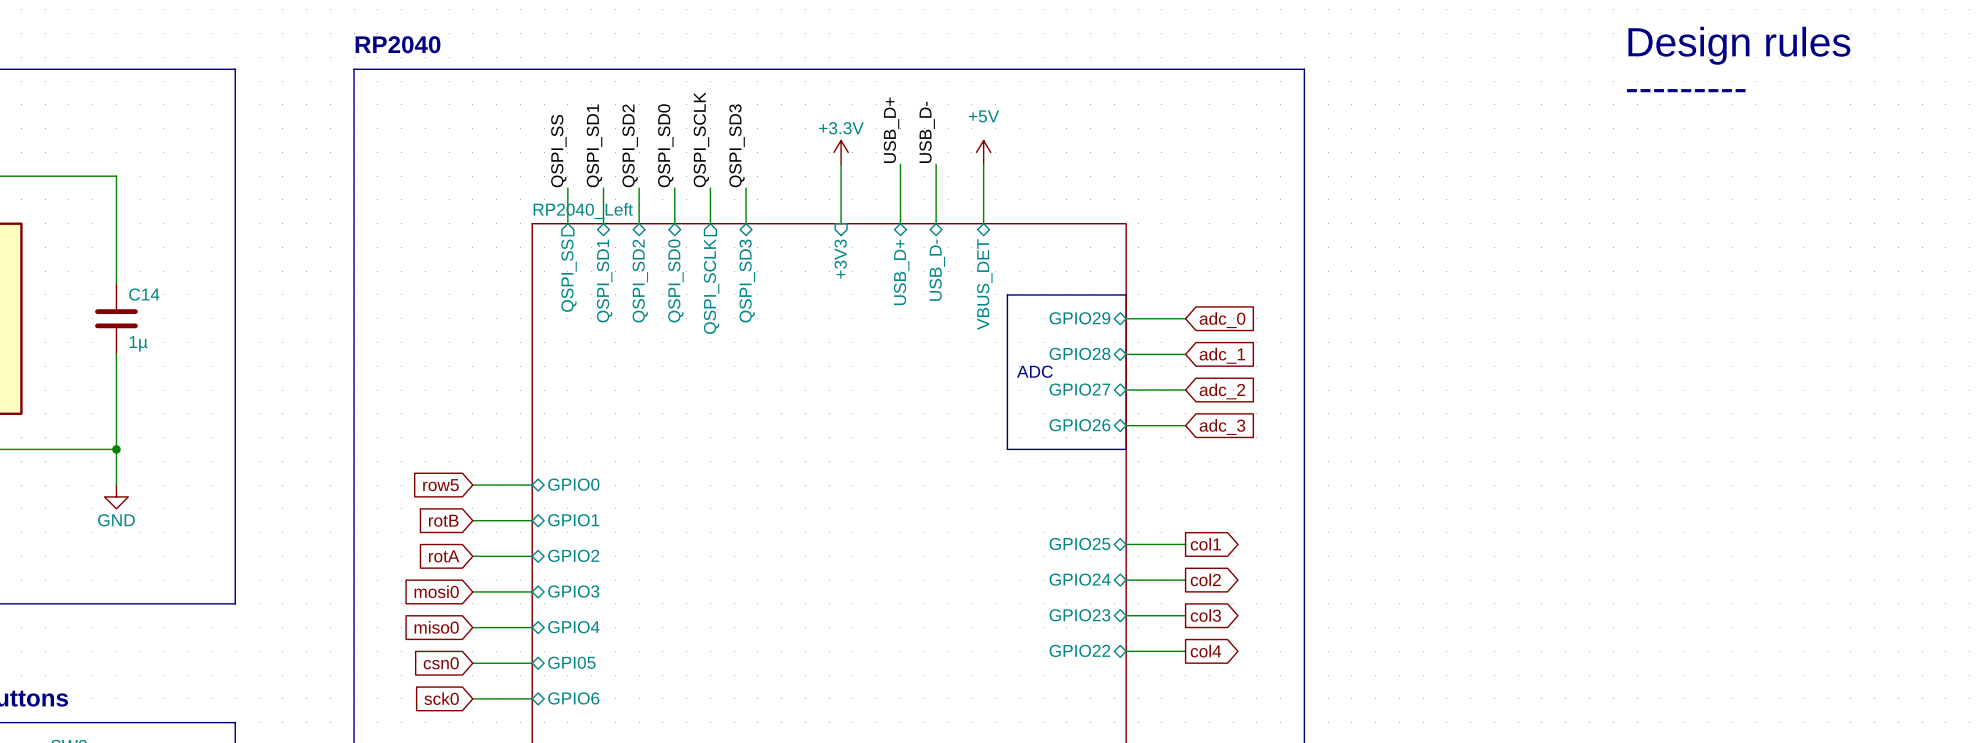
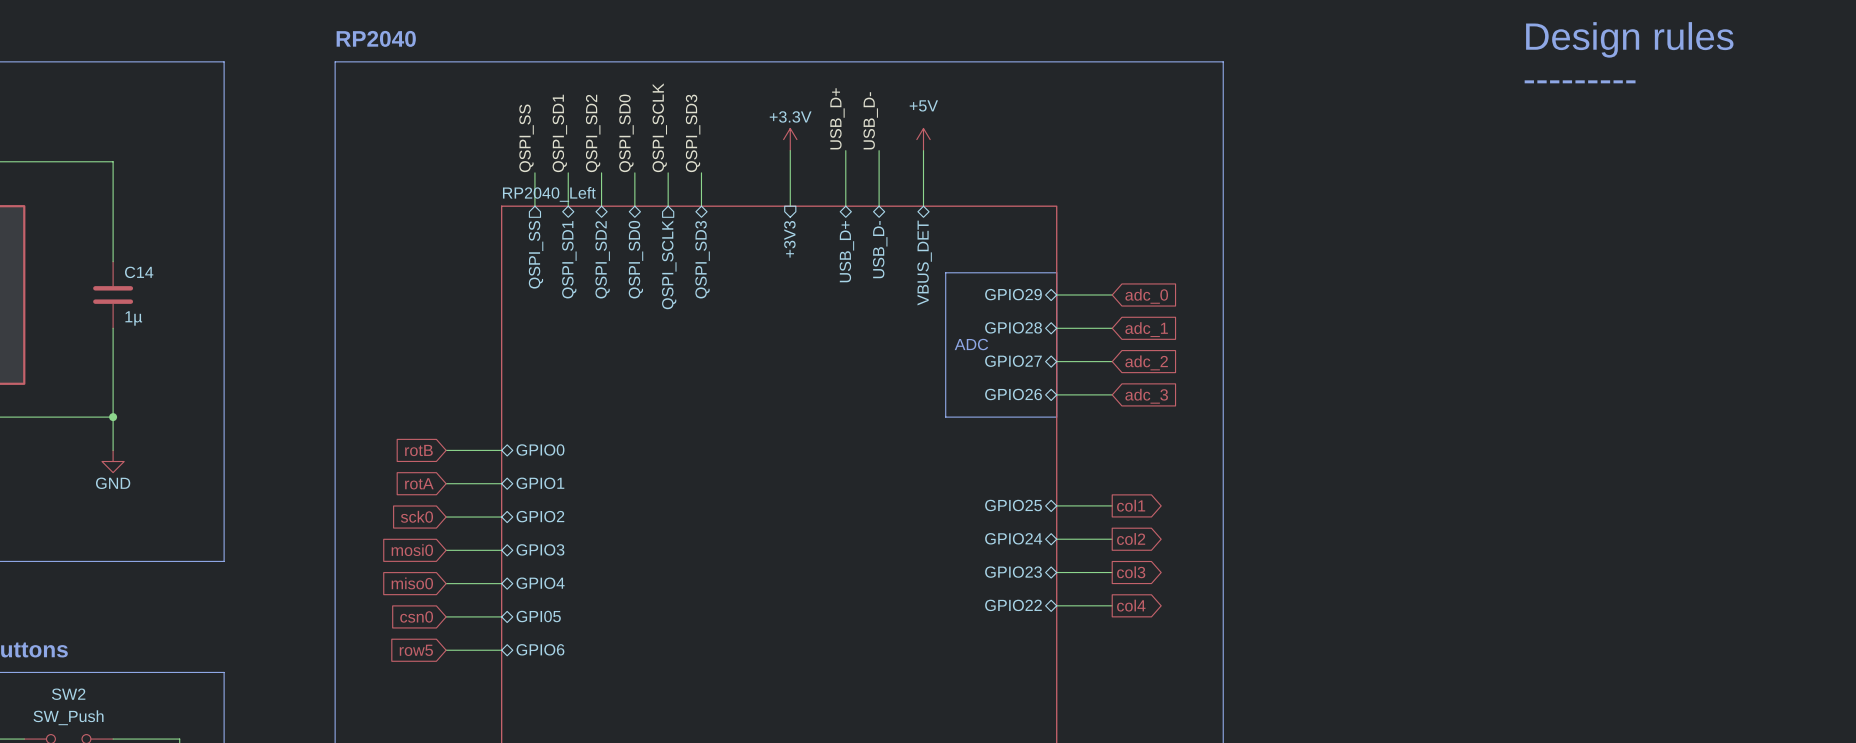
global label: row5 (440, 485) -> rotB (418, 450)
global label: rotB (443, 520) -> rotA (419, 483)
global label: rotA (444, 556) -> sck0 (416, 516)
global label: sck0 (441, 698) -> row5 (416, 650)

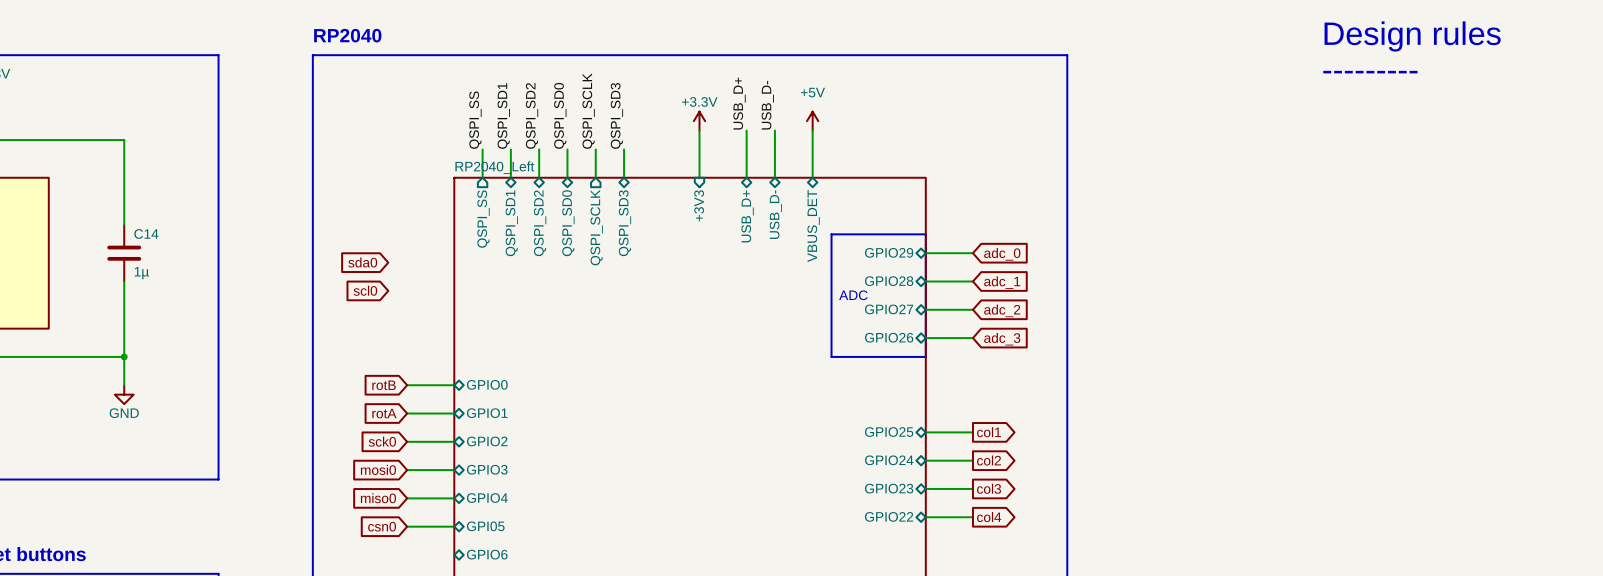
global label: none -> sda0 (362, 262)
global label: none -> scl0 (365, 290)
global label: row5 (416, 650) -> none
wire: (446, 650) (501, 650) -> none

